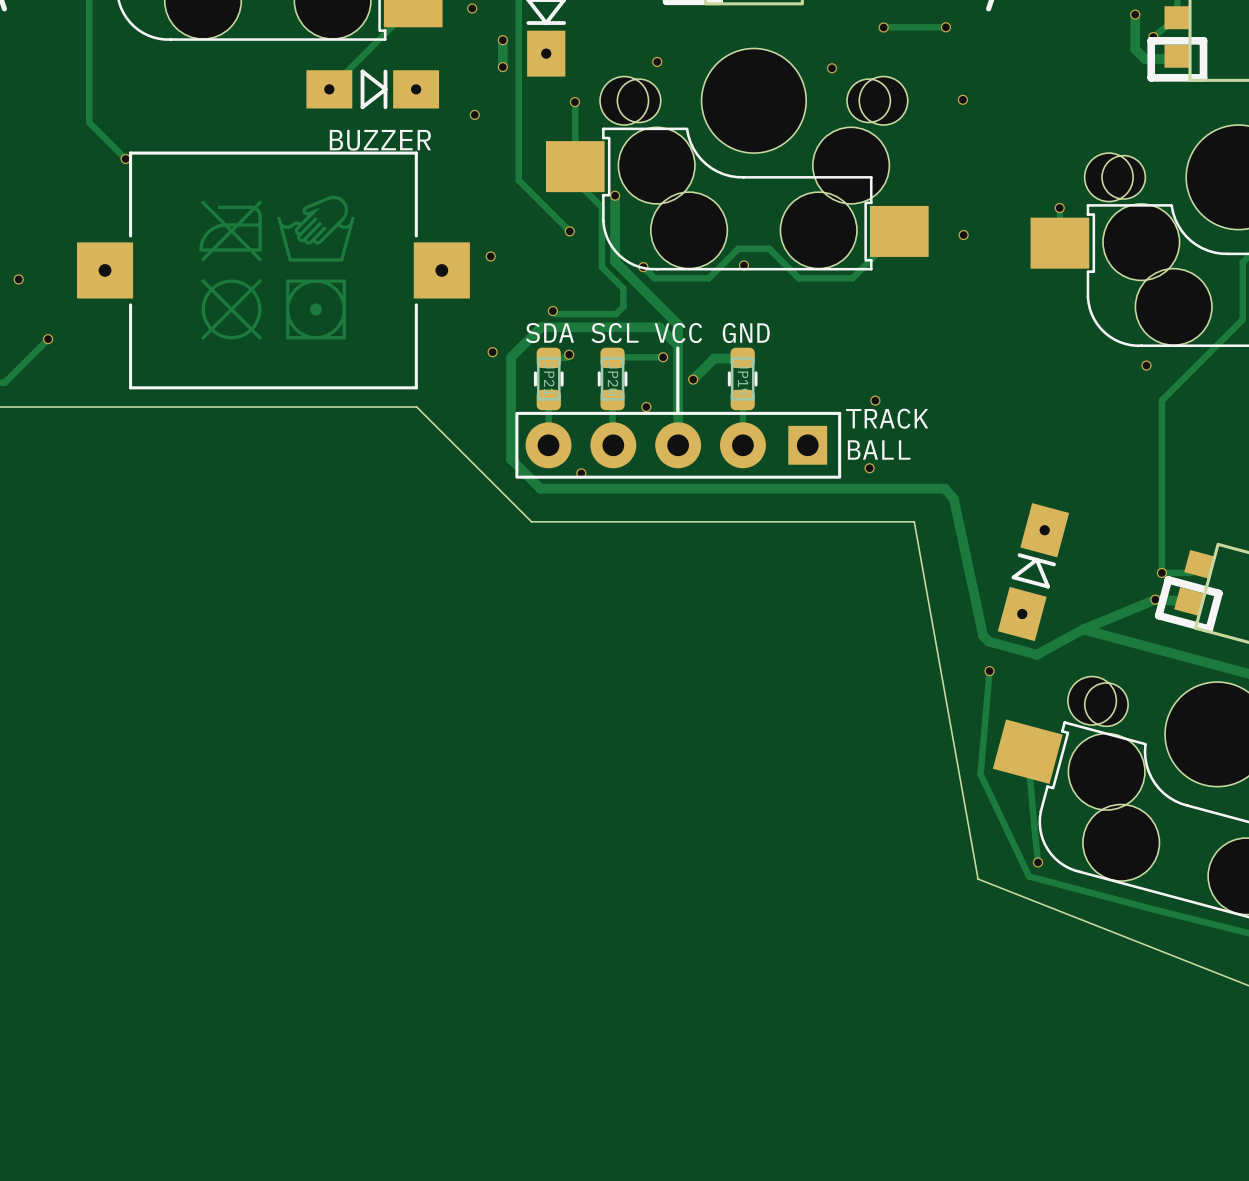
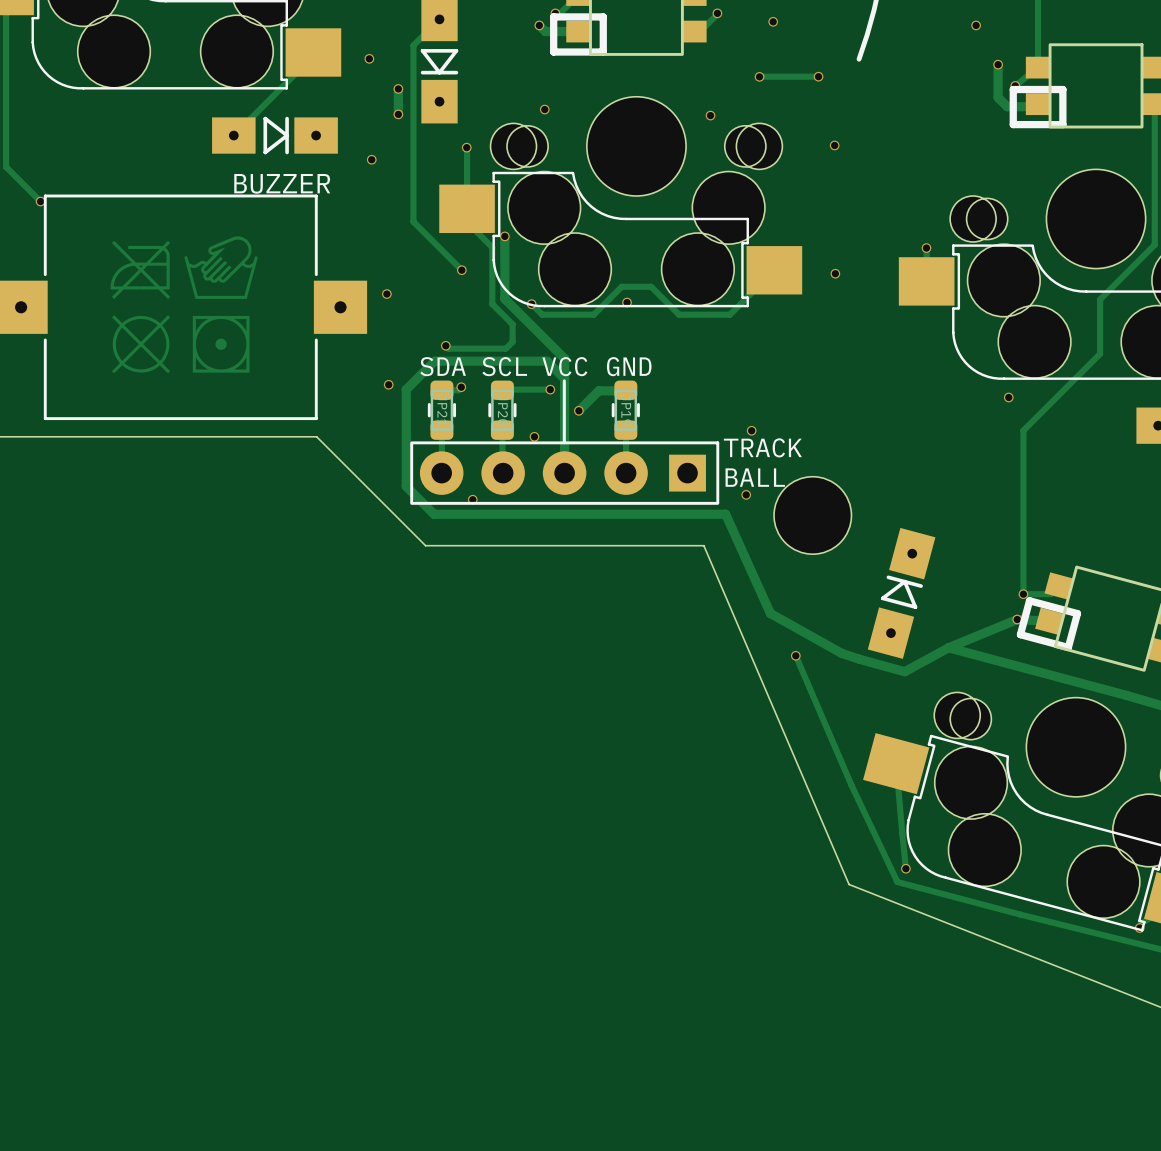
track: (847, 488) (944, 488) (953, 498) (983, 635) (988, 641) -> (725, 514) (770, 613) (841, 653) (859, 659)
part: none -> (812, 515)
board edge: (824, 521) (914, 521) (978, 879) -> (703, 545) (849, 884)
track: (989, 671) (980, 774) -> (795, 655) (851, 785)
via position: (989, 671) -> (795, 655)

